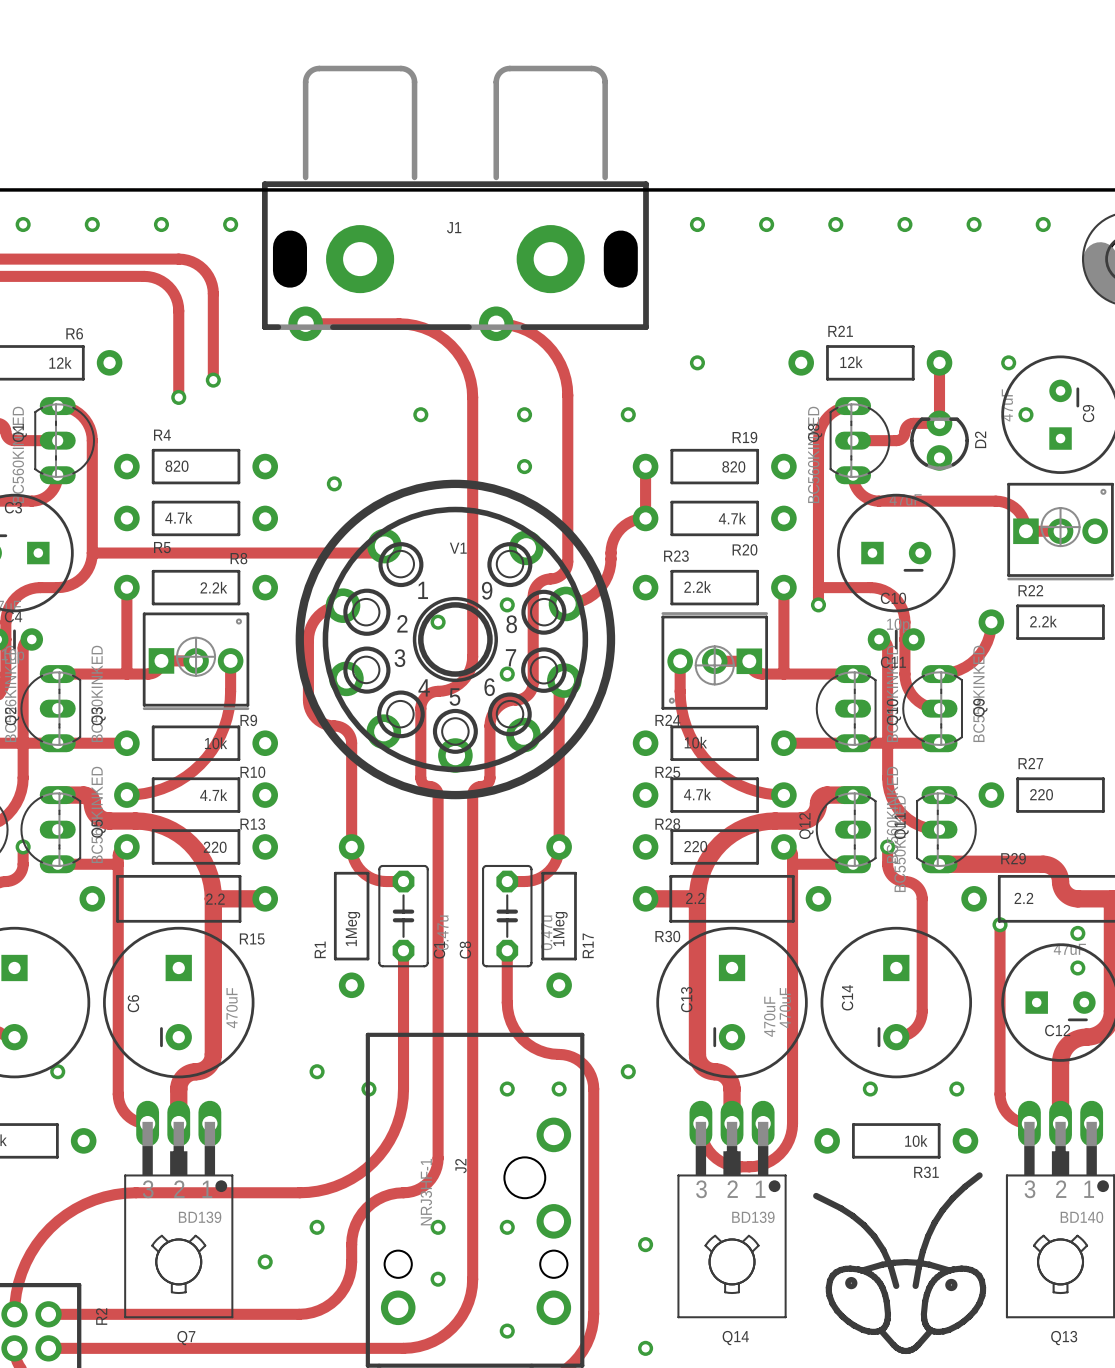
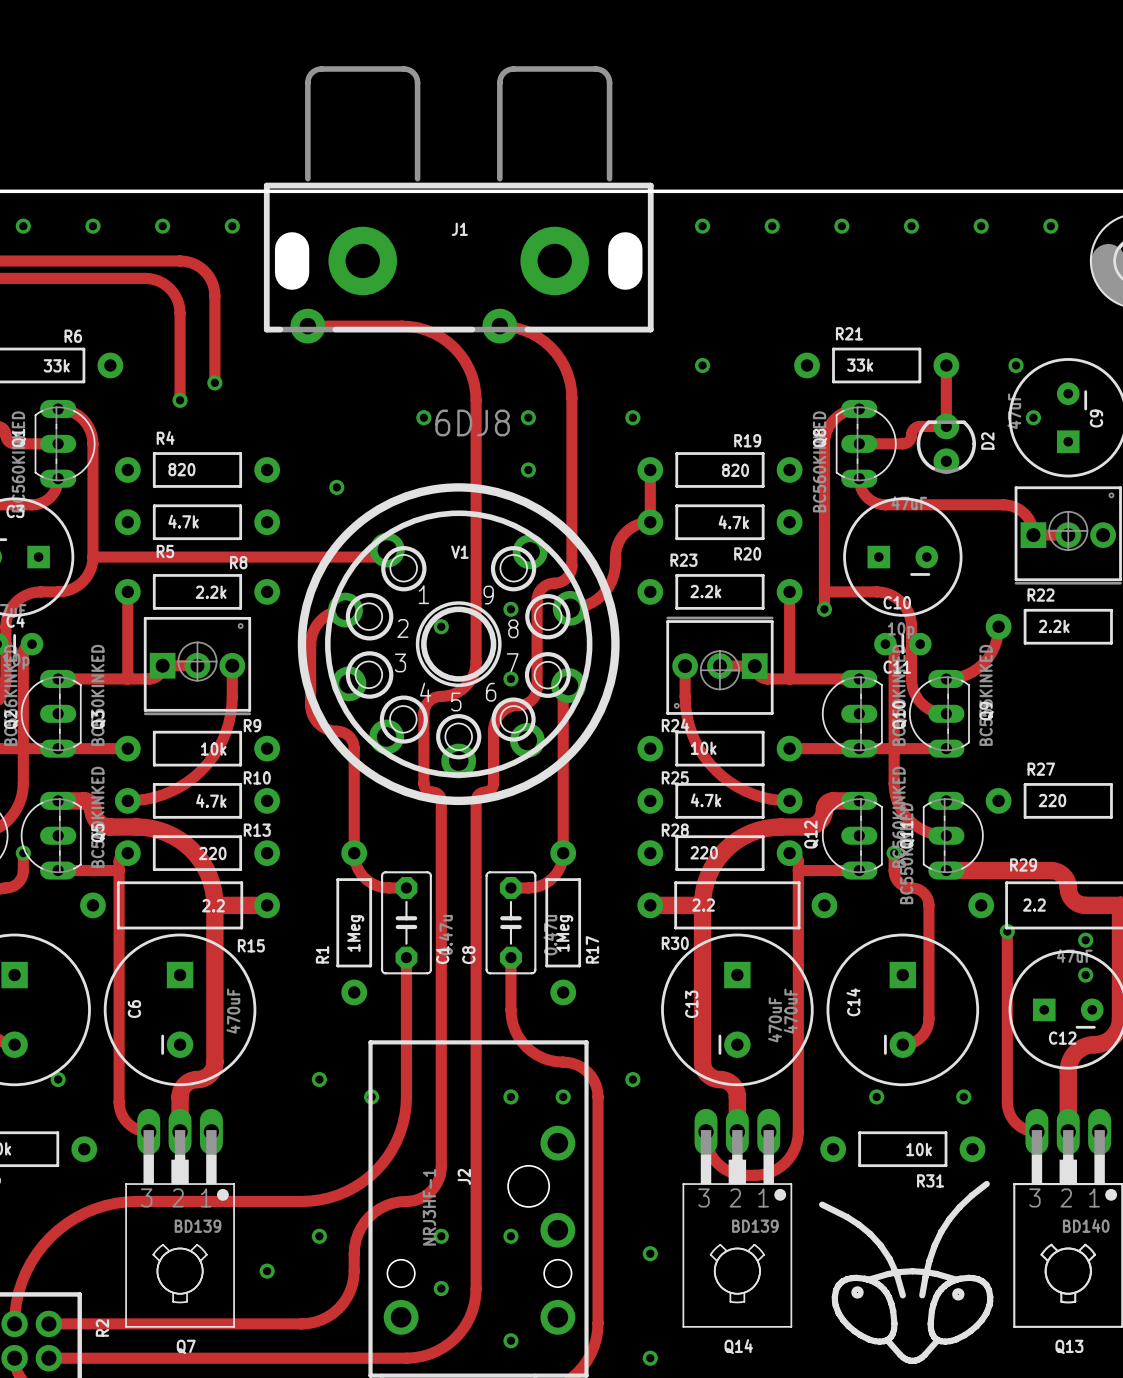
R6 value: 12k (60, 362) -> 33k (56, 365)
R21 value: 12k (851, 362) -> 33k (860, 365)
V1 value: none -> 6DJ8 (472, 422)

